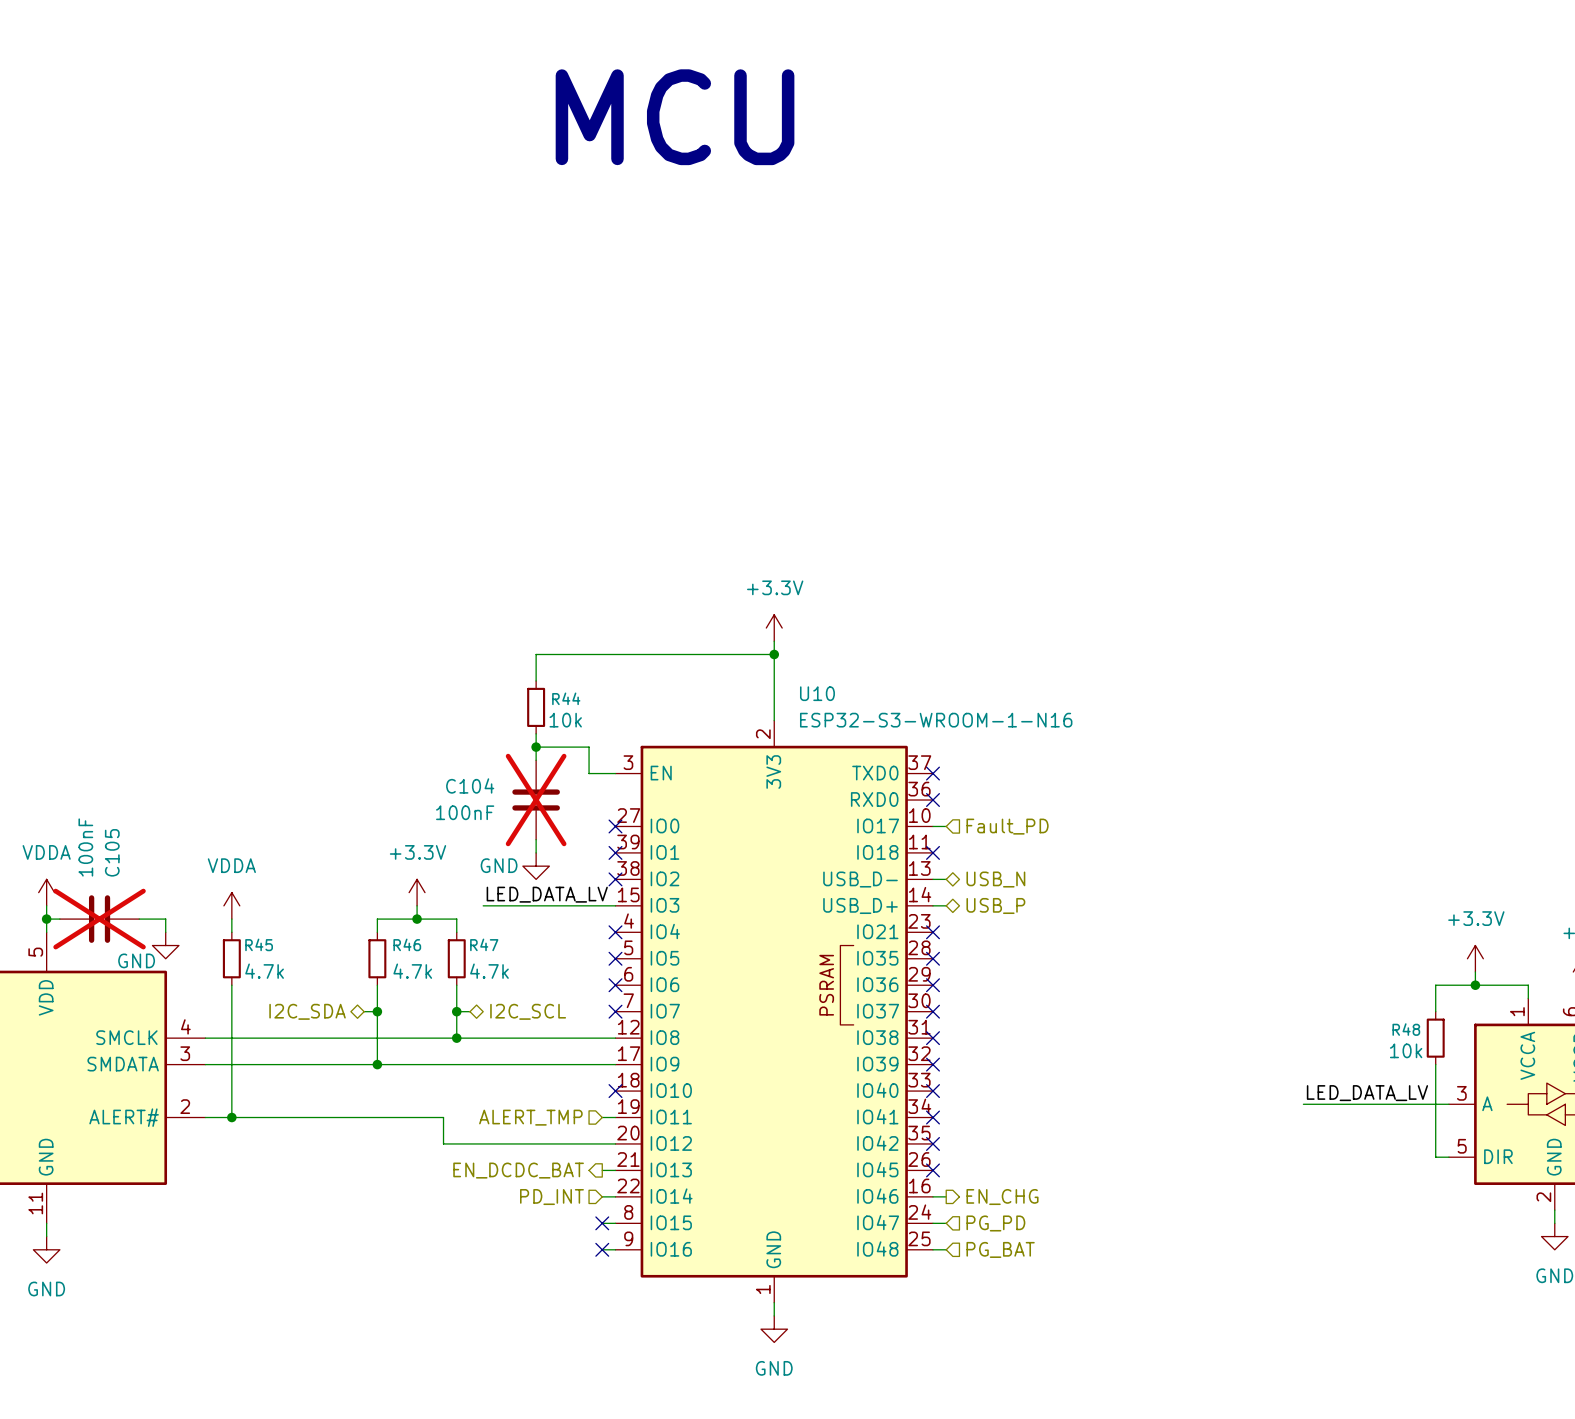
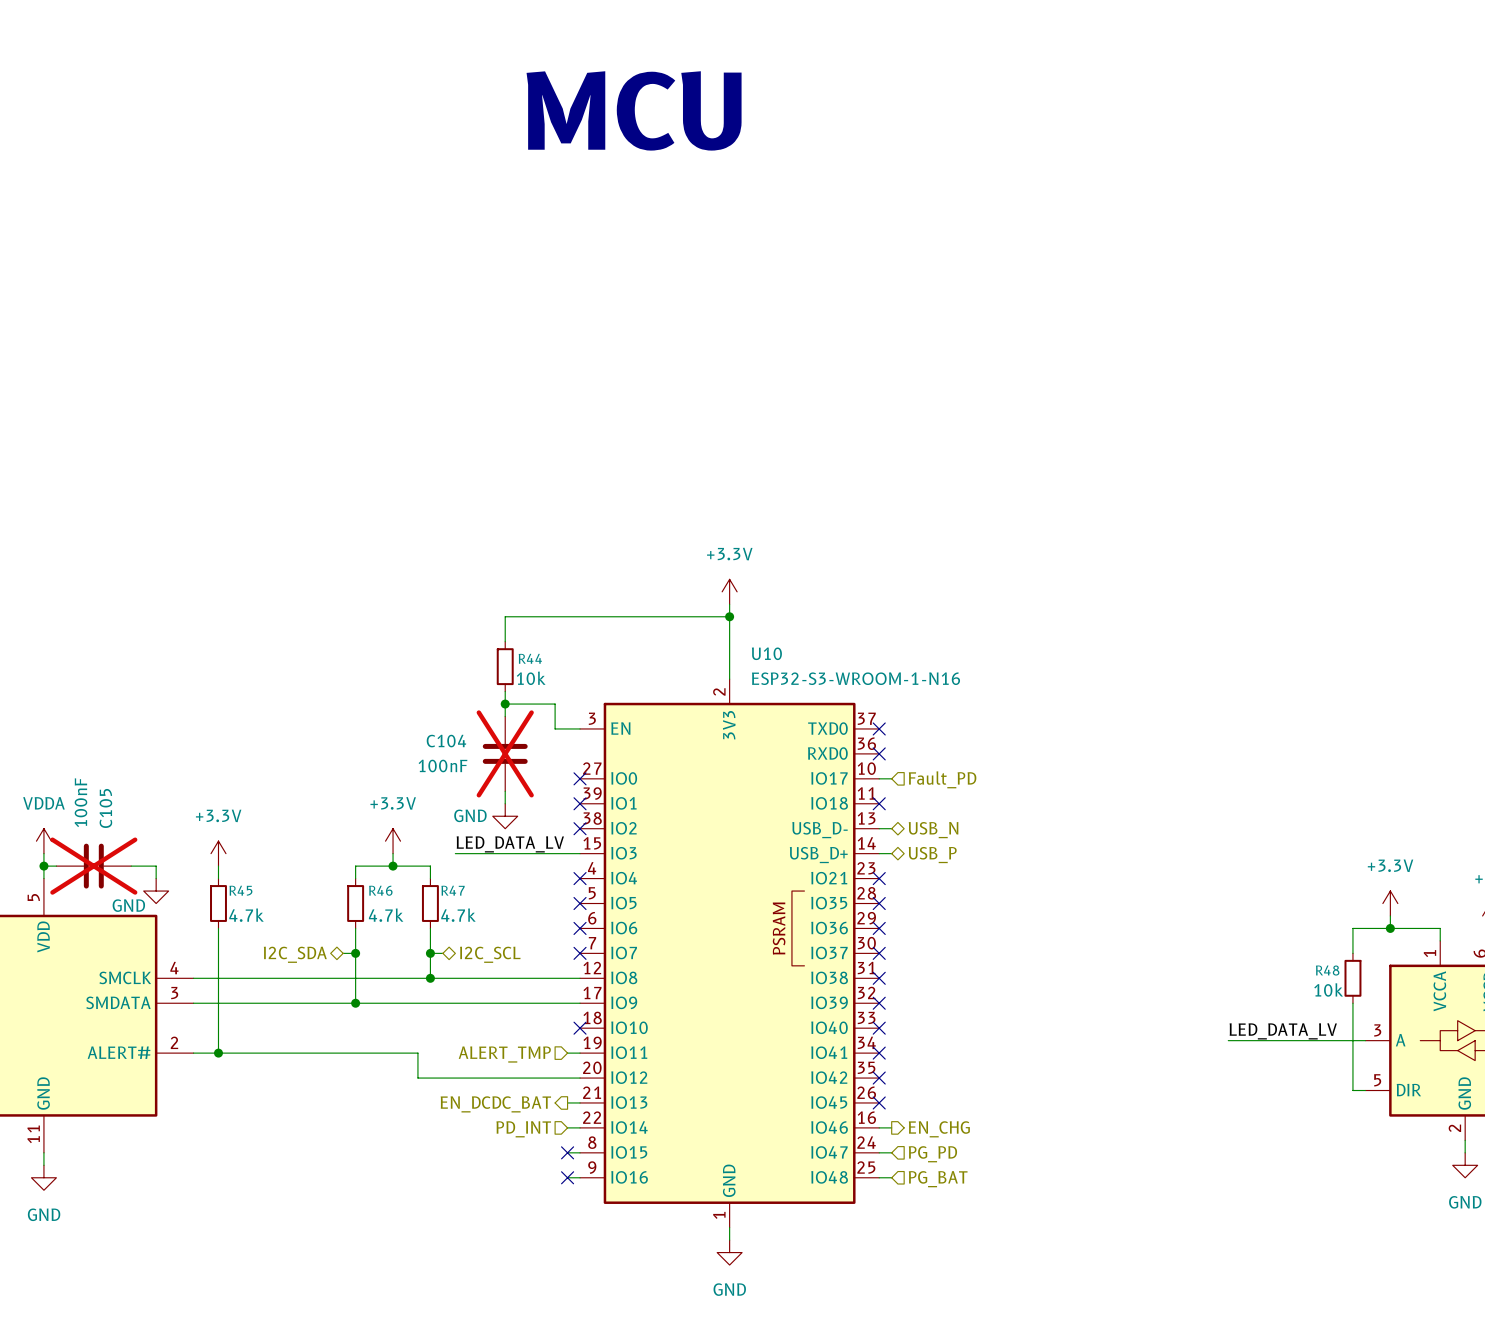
power symbol: VDDA (231, 905) -> +3.3V (218, 853)

